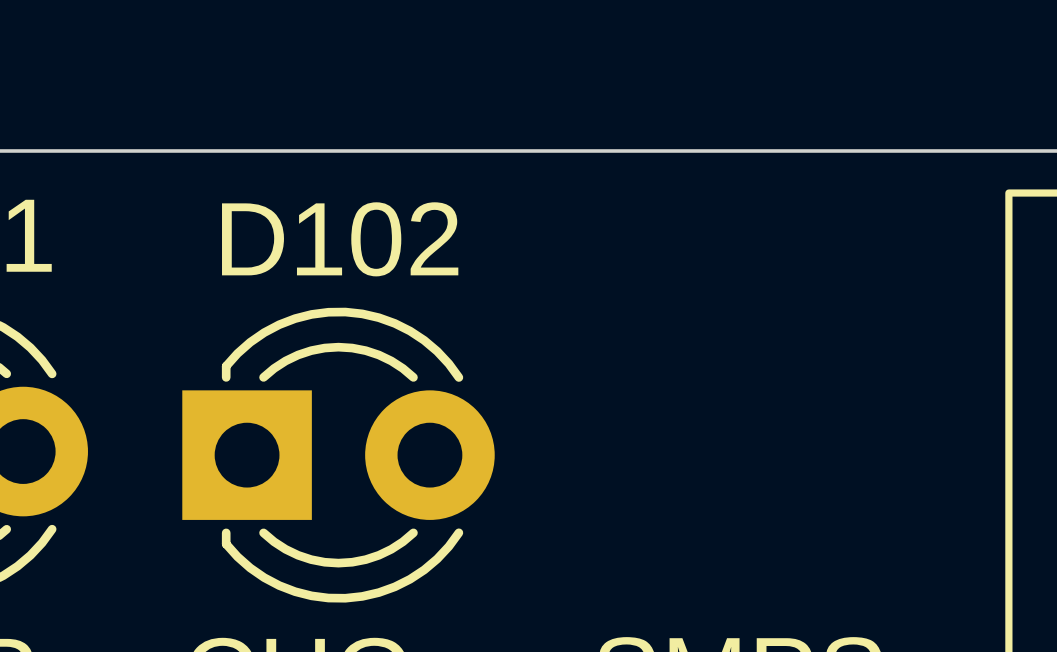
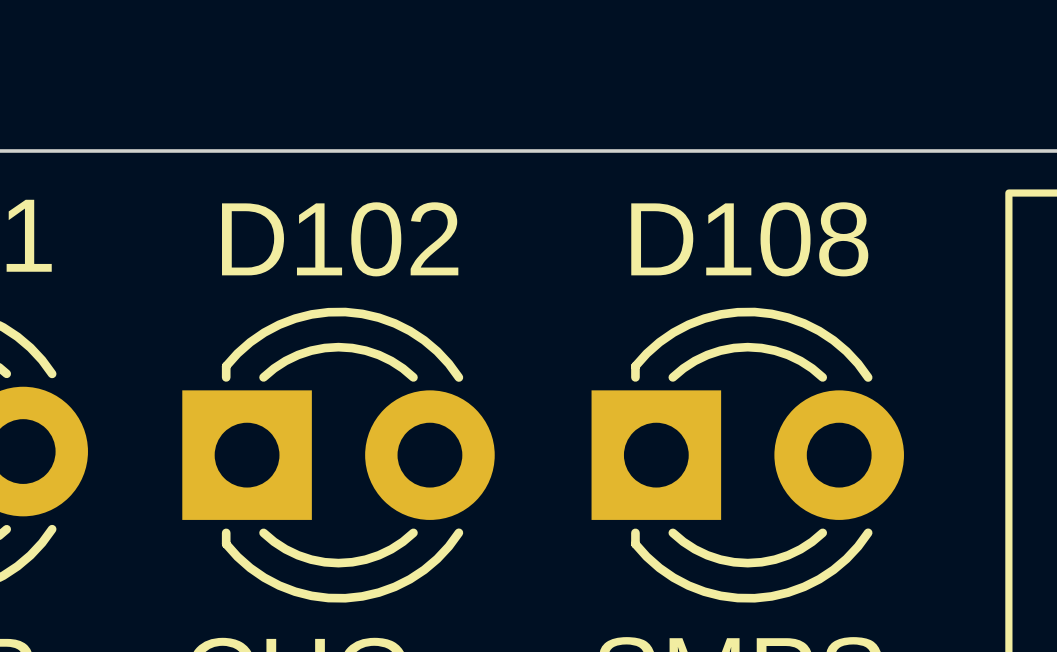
D108: none -> (747, 455)

